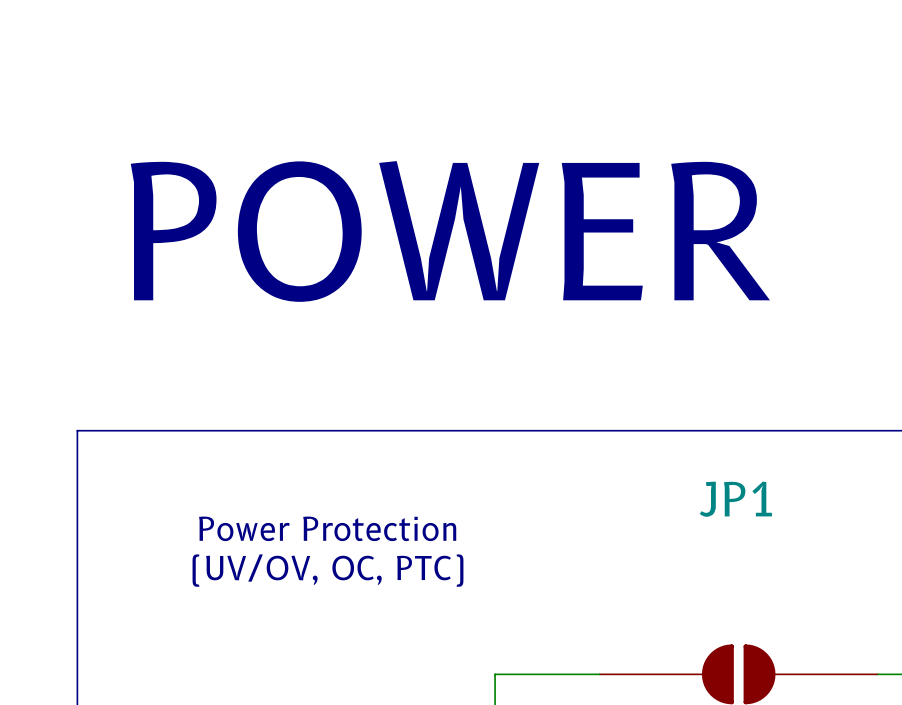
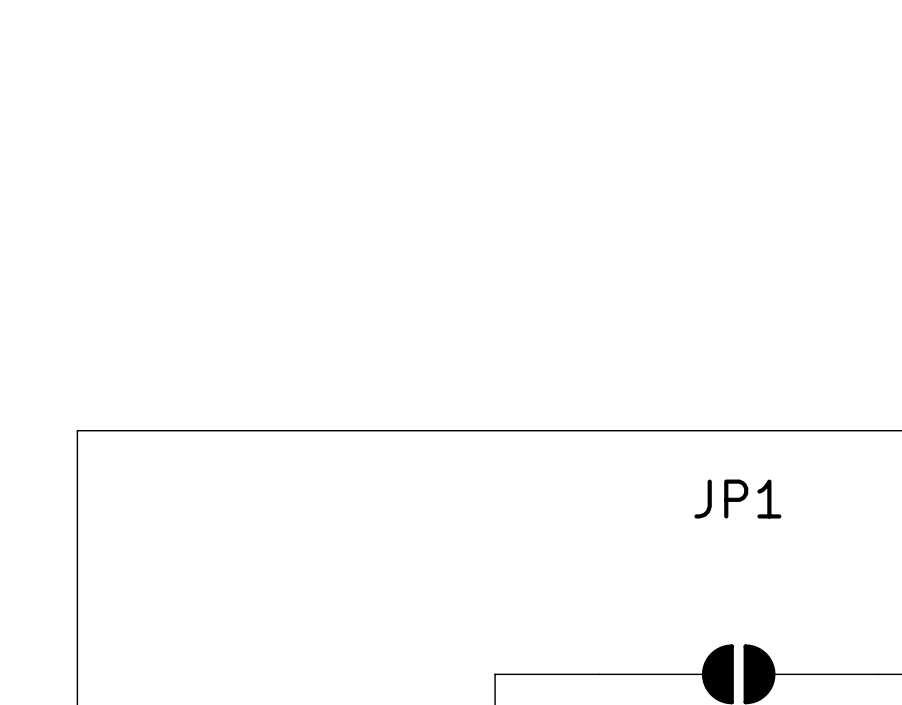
text: POWER (450, 231) -> none
text: Power Protection (327, 528) -> none
text: (UV/OV, OC, PTC) (327, 570) -> none

